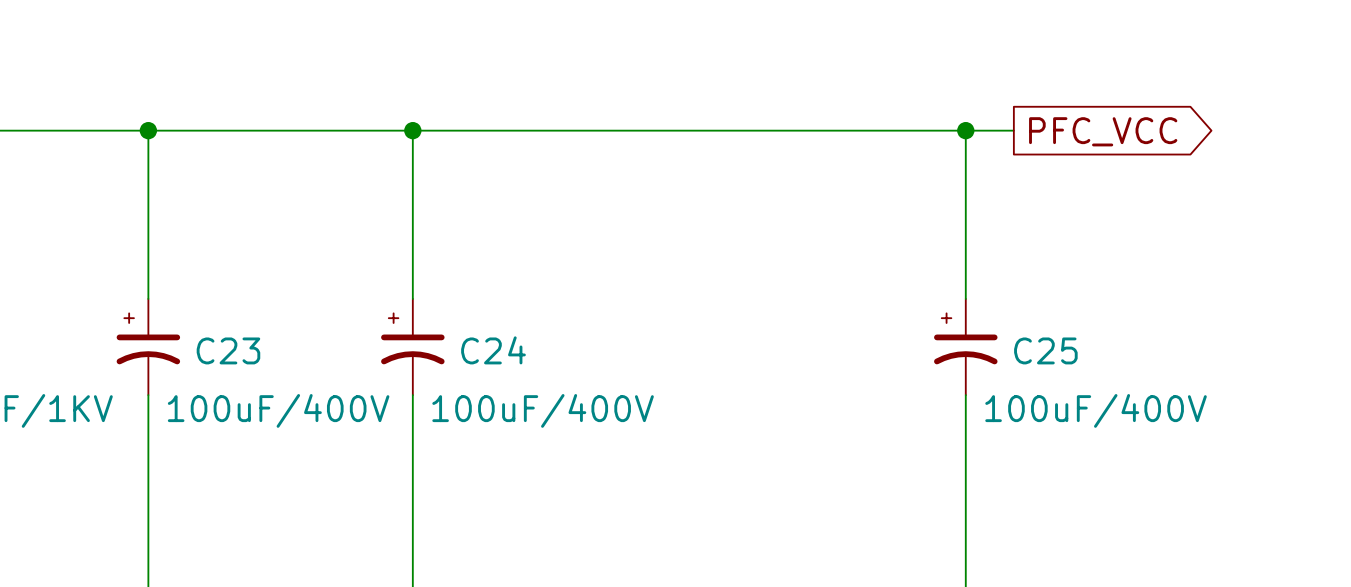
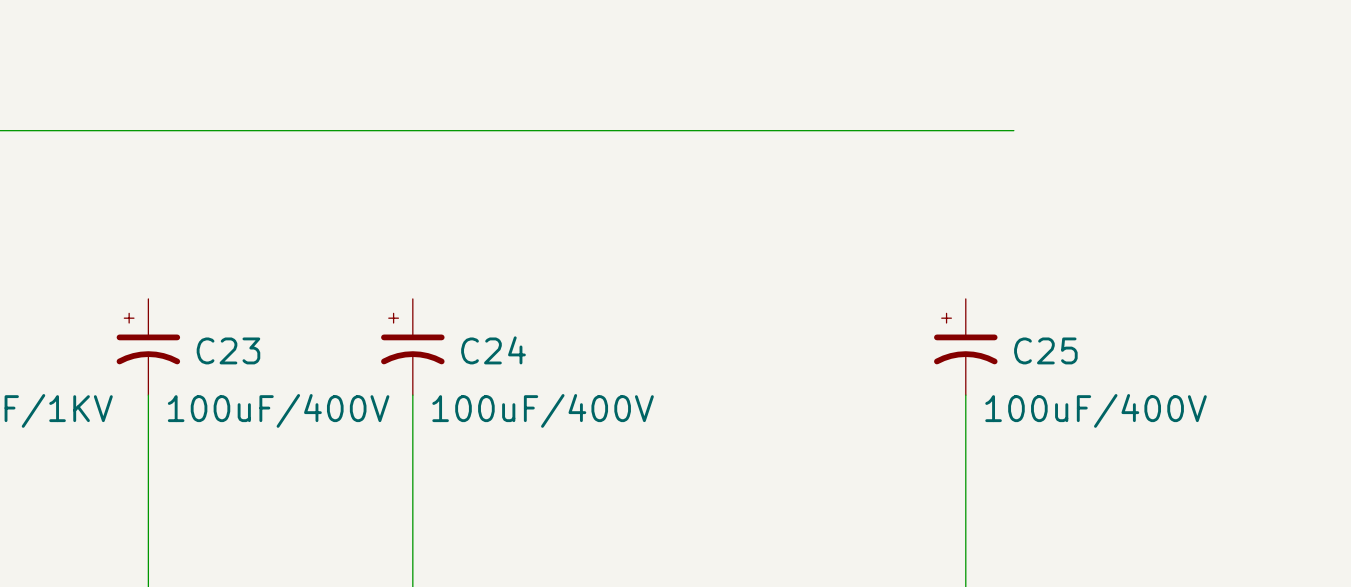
wire: (148, 130) (148, 298) -> none
junction: (148, 130) -> none
wire: (412, 130) (412, 298) -> none
junction: (412, 130) -> none
wire: (965, 130) (965, 298) -> none
junction: (965, 130) -> none
global label: PFC_VCC (1103, 131) -> none

